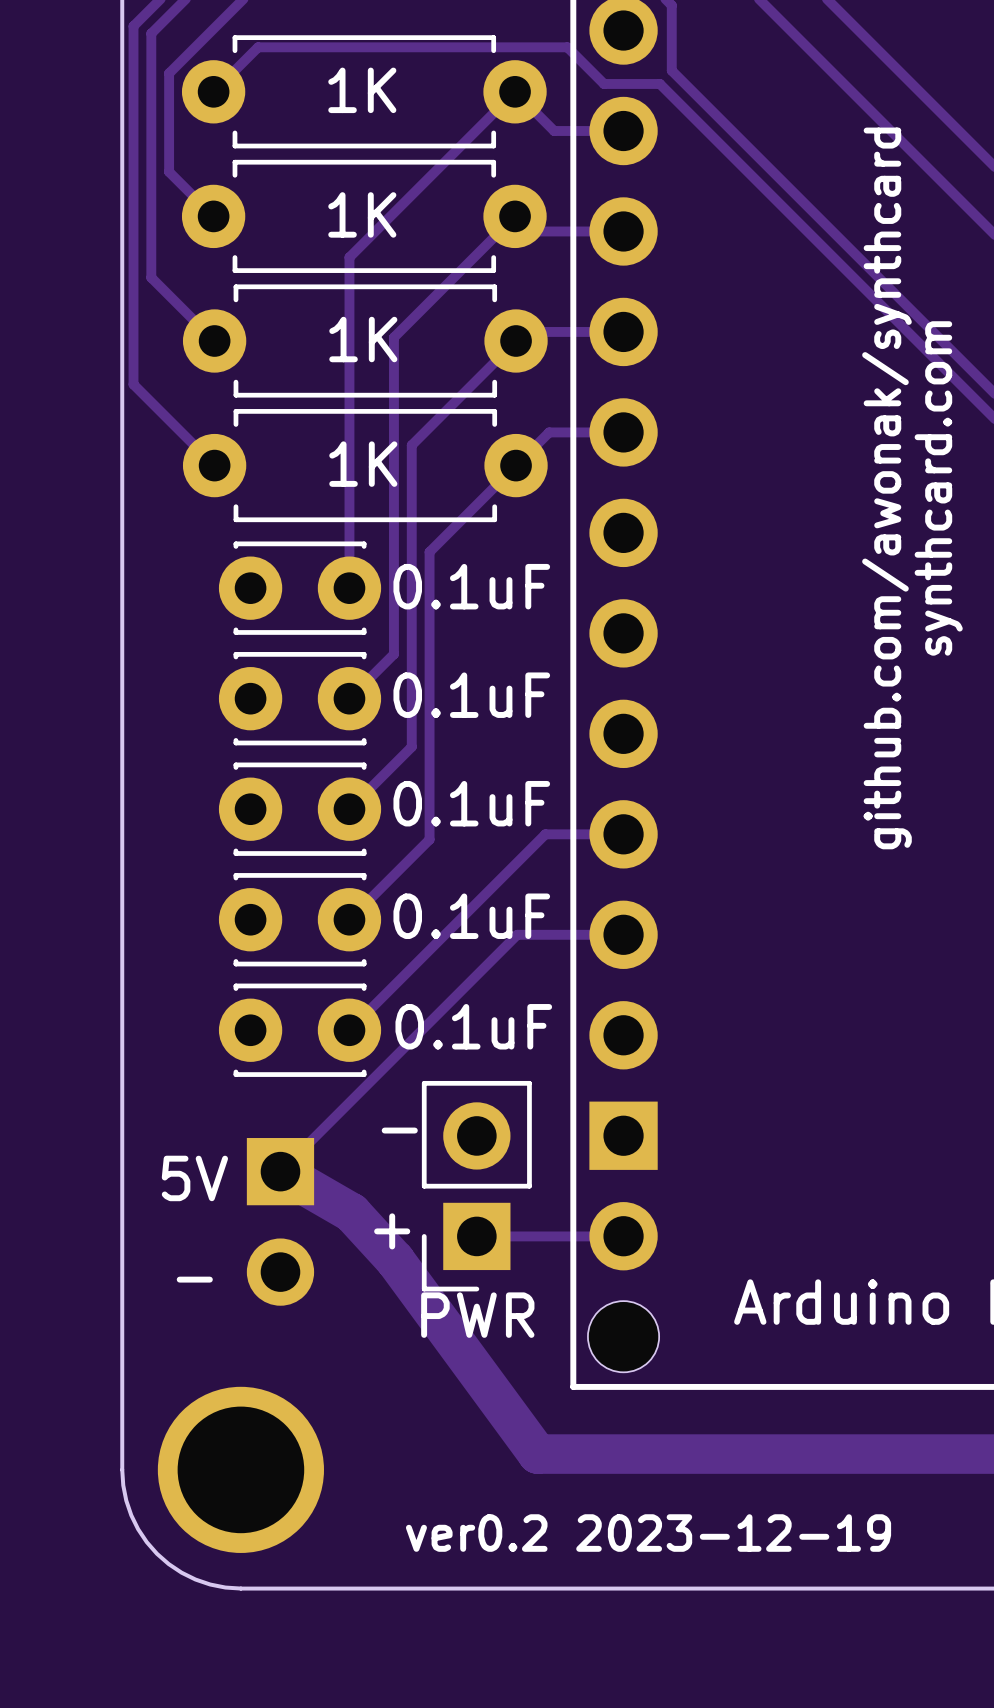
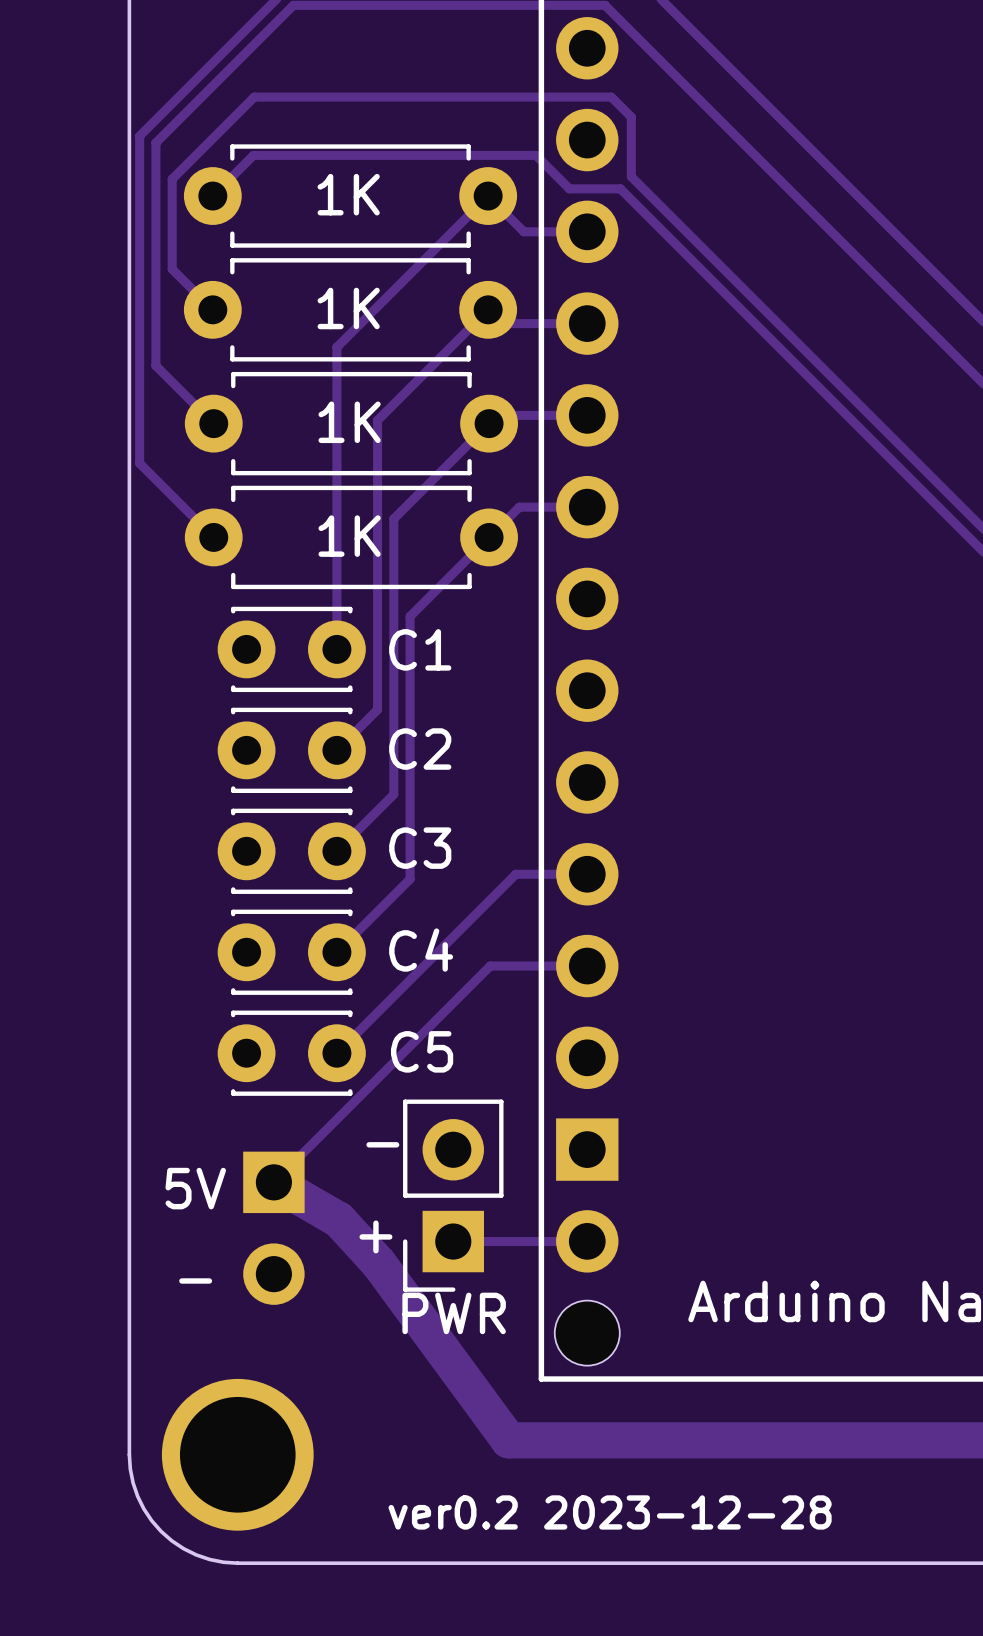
text: github.com/awonak/synthcard (886, 488) -> none
text: synthcard.com (938, 488) -> none
part value: 0.1uF (471, 586) -> C1 (420, 649)
part value: 0.1uF (471, 695) -> C2 (420, 749)
part value: 0.1uF (471, 803) -> C3 (420, 848)
part value: 0.1uF (471, 916) -> C4 (421, 950)
part value: 0.1uF (473, 1026) -> C5 (422, 1051)
text: ver0.2 2023-12-19 (648, 1533) -> ver0.2 2023-12-28 (610, 1512)

